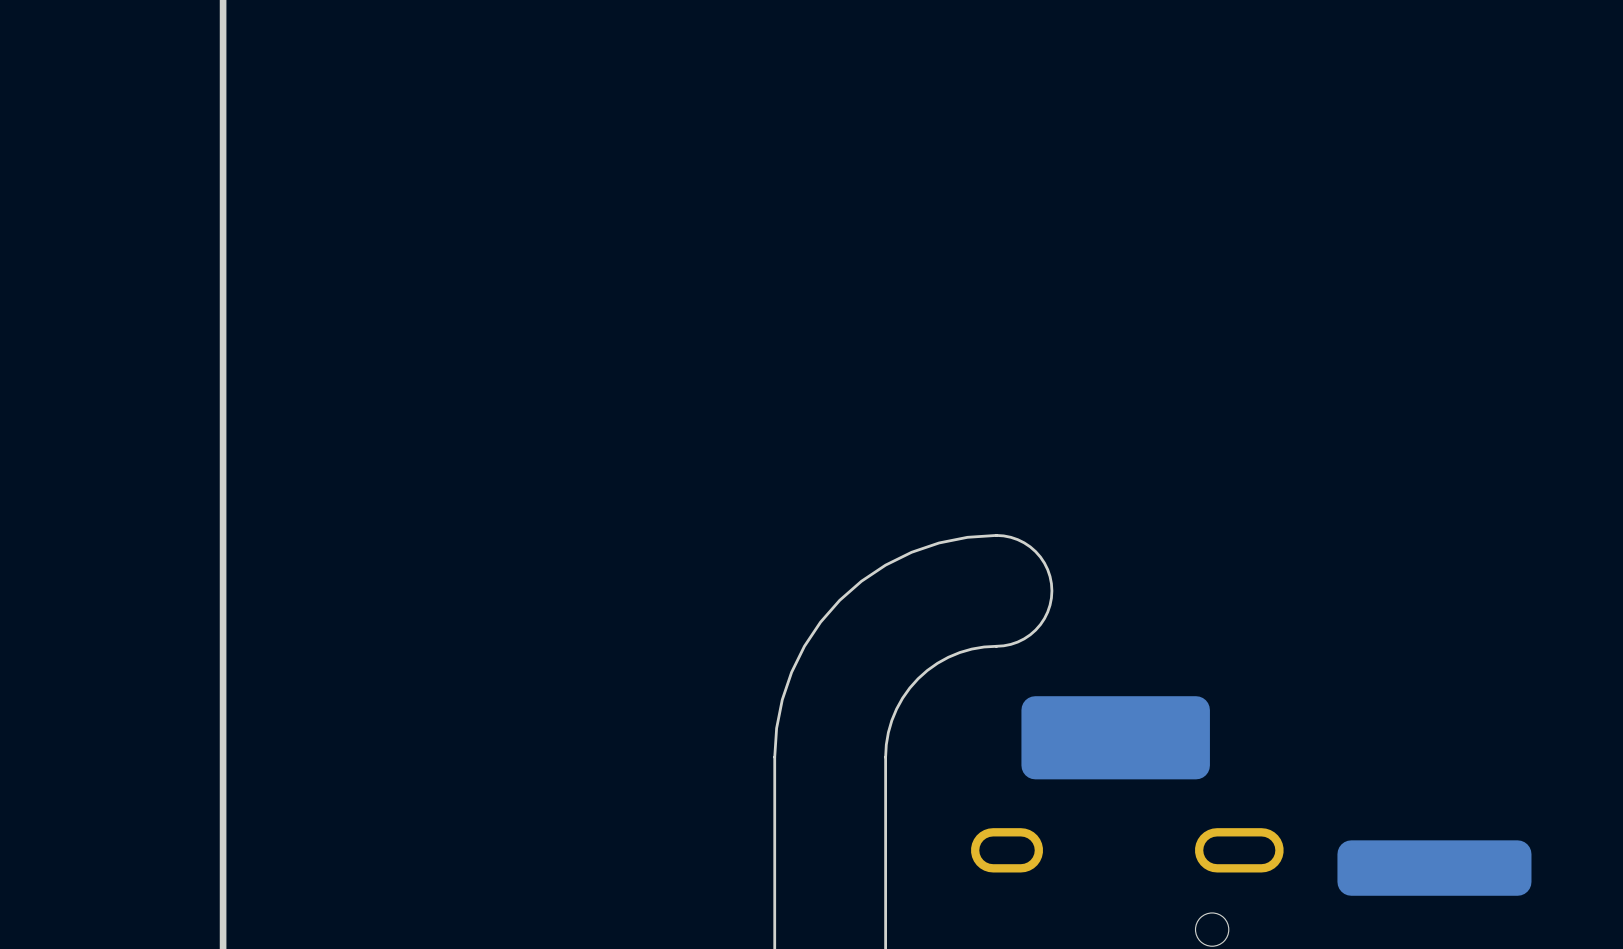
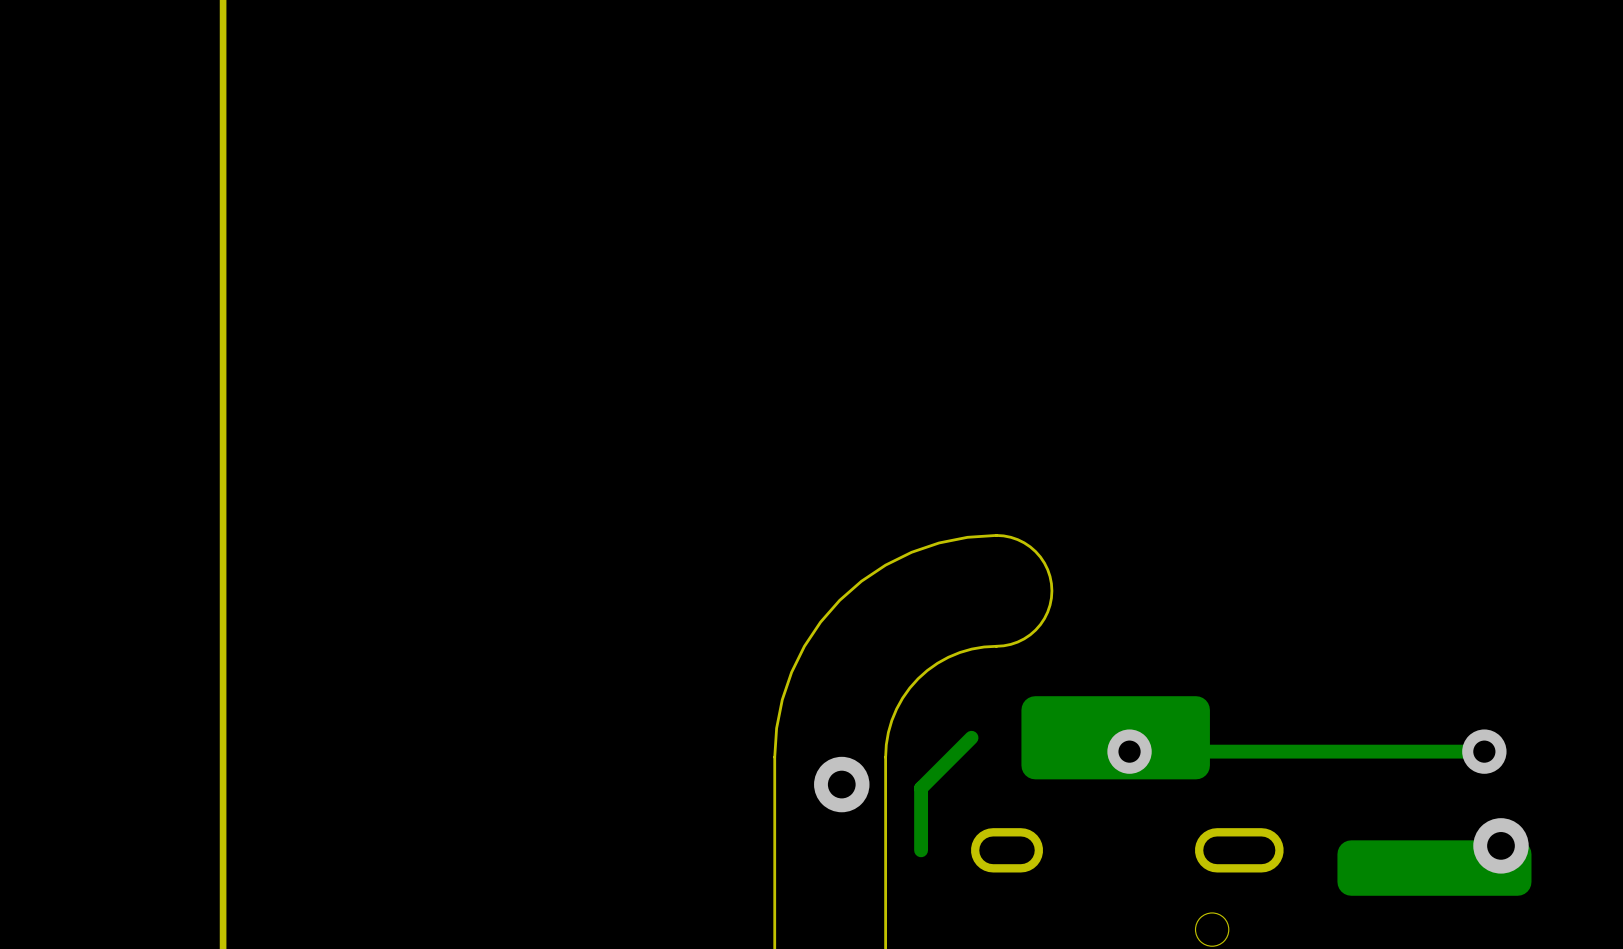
track: none -> (971, 737) (921, 788) (921, 850)
via: none -> (1129, 751)
track: none -> (1484, 751) (1129, 751)
via: none -> (1484, 751)
via: none -> (841, 784)
via: none -> (1500, 845)

